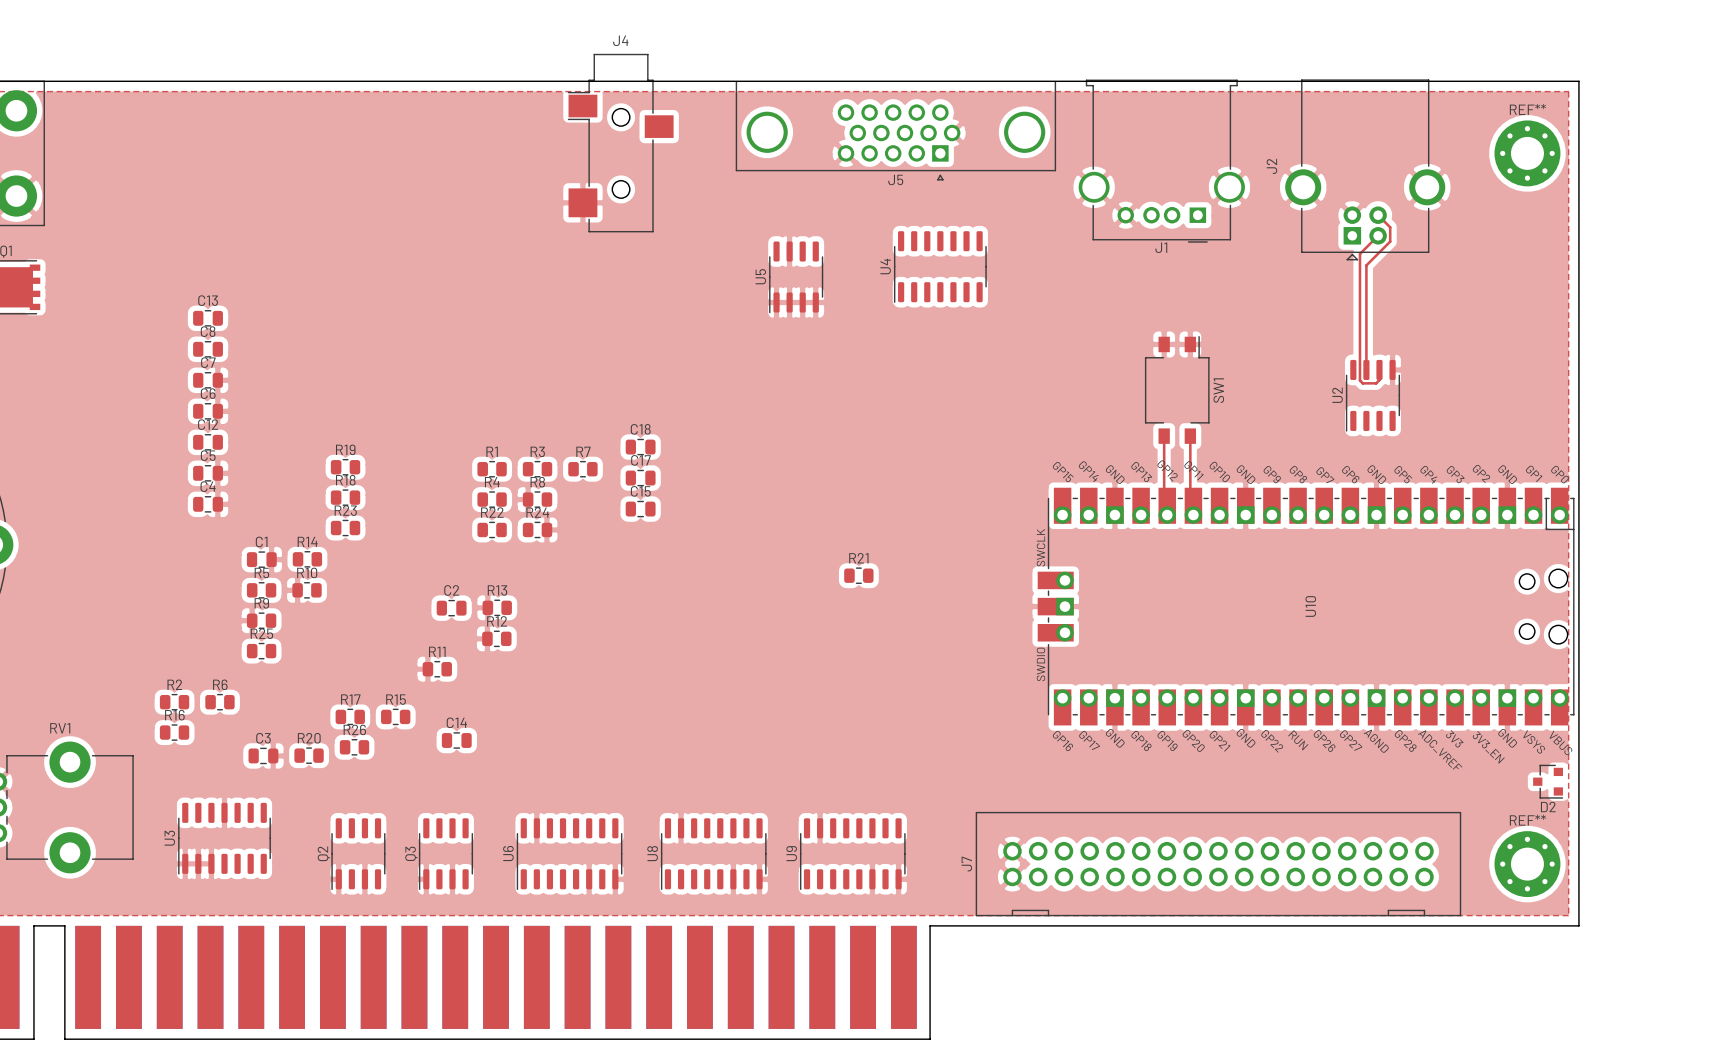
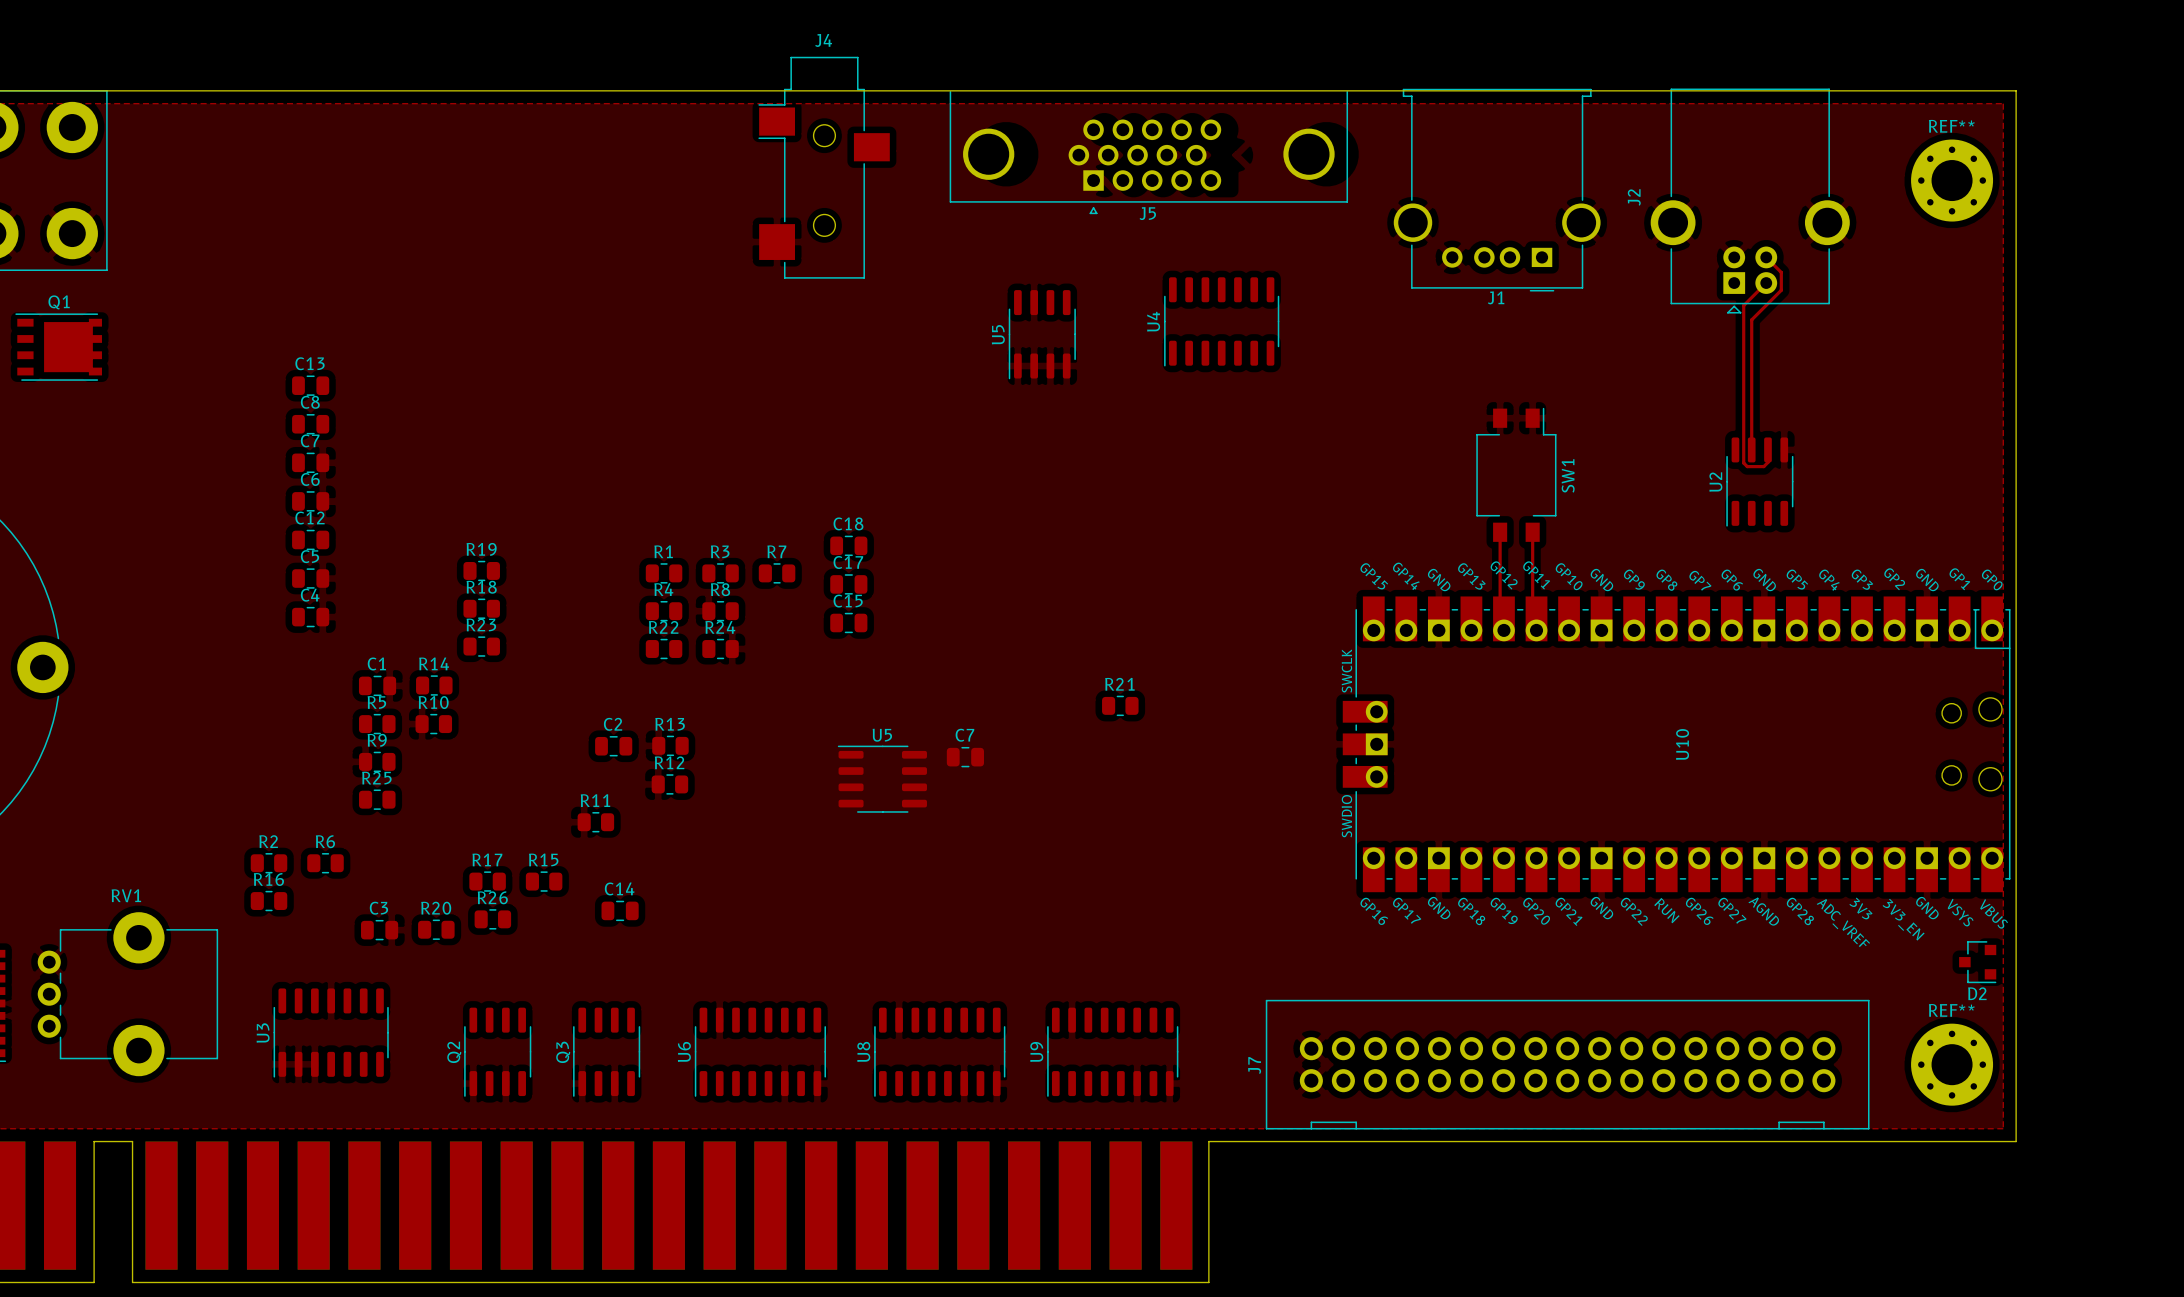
J5 footprint: [735, 81, 1057, 181] -> [949, 90, 1349, 215]
C7: none -> (965, 757)
U5: none -> (882, 779)

